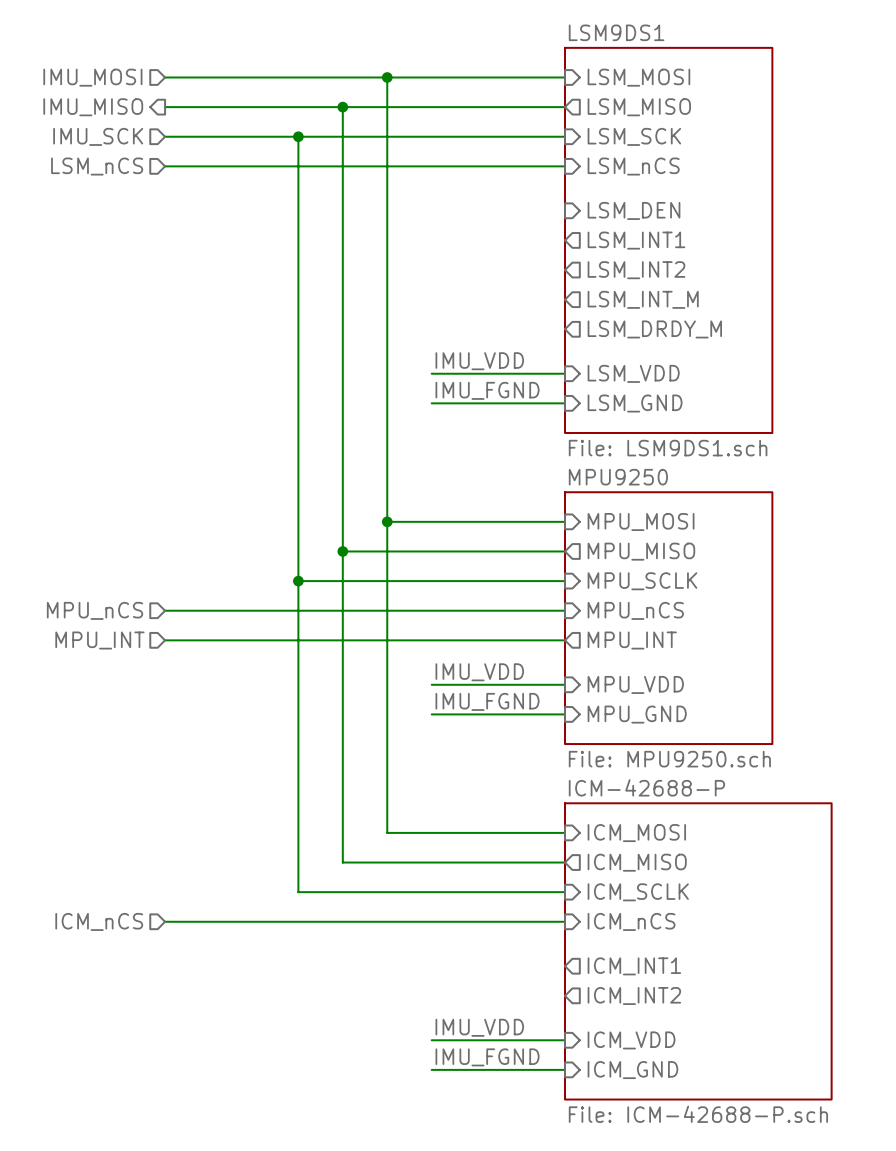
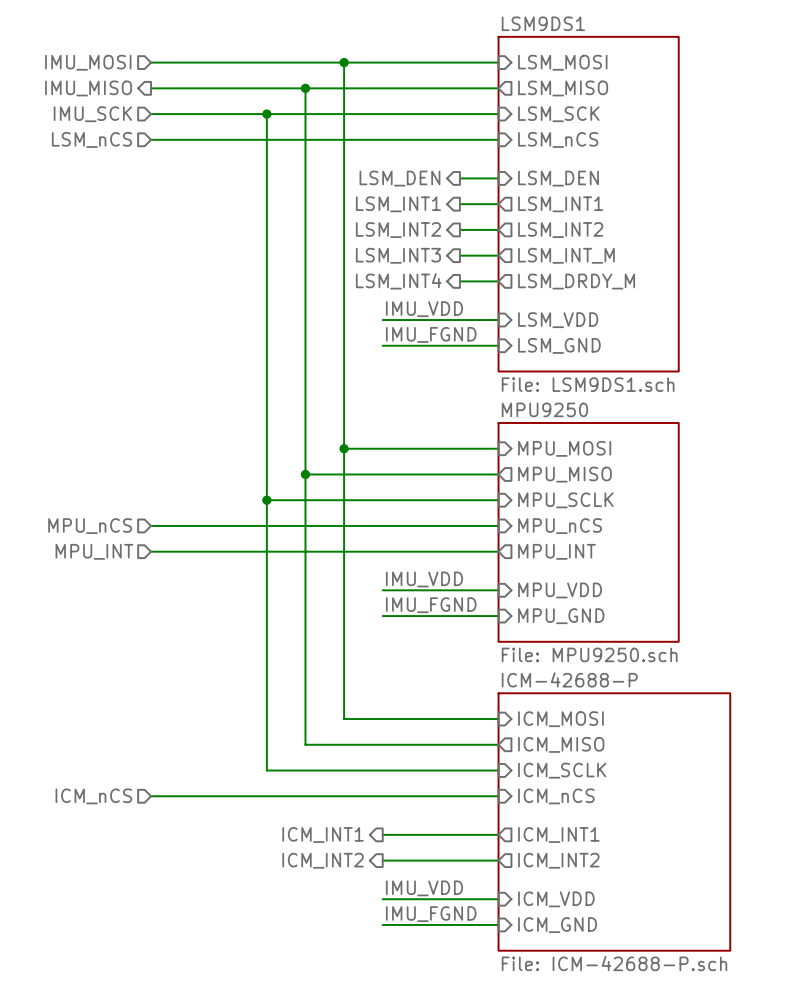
hierarchical label: none -> LSM_DEN (399, 178)
wire: none -> (459, 178) (498, 178)
hierarchical label: none -> LSM_INT1 (398, 204)
wire: none -> (459, 204) (498, 204)
hierarchical label: none -> LSM_INT2 (398, 230)
wire: none -> (459, 229) (498, 229)
hierarchical label: none -> LSM_INT3 (398, 255)
wire: none -> (459, 255) (498, 255)
hierarchical label: none -> LSM_INT4 (398, 281)
wire: none -> (459, 281) (498, 281)
hierarchical label: none -> ICM_INT1 (323, 835)
wire: none -> (382, 834) (498, 834)
hierarchical label: none -> ICM_INT2 (323, 860)
wire: none -> (382, 860) (498, 860)

